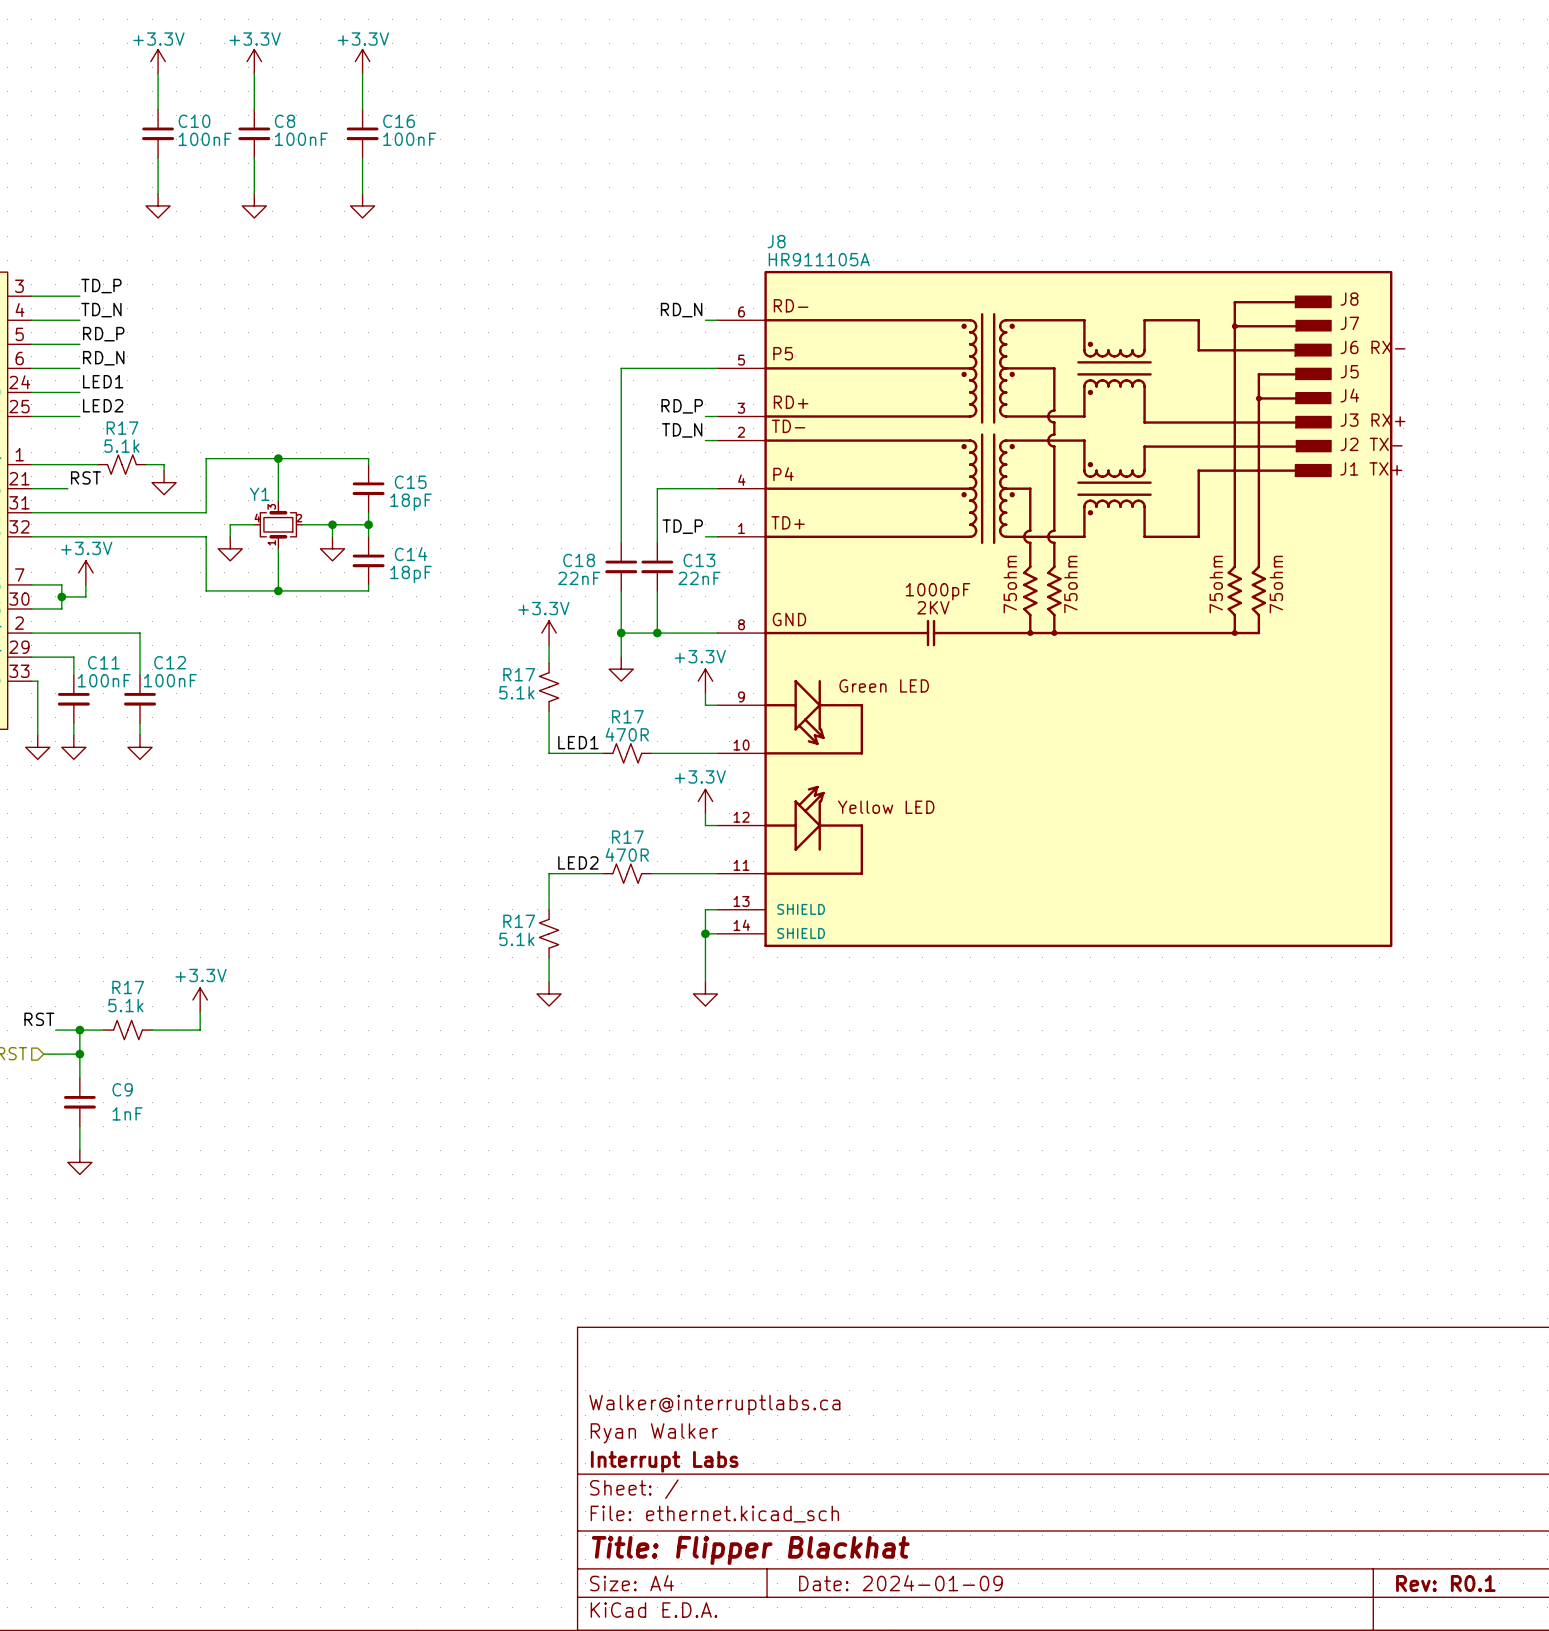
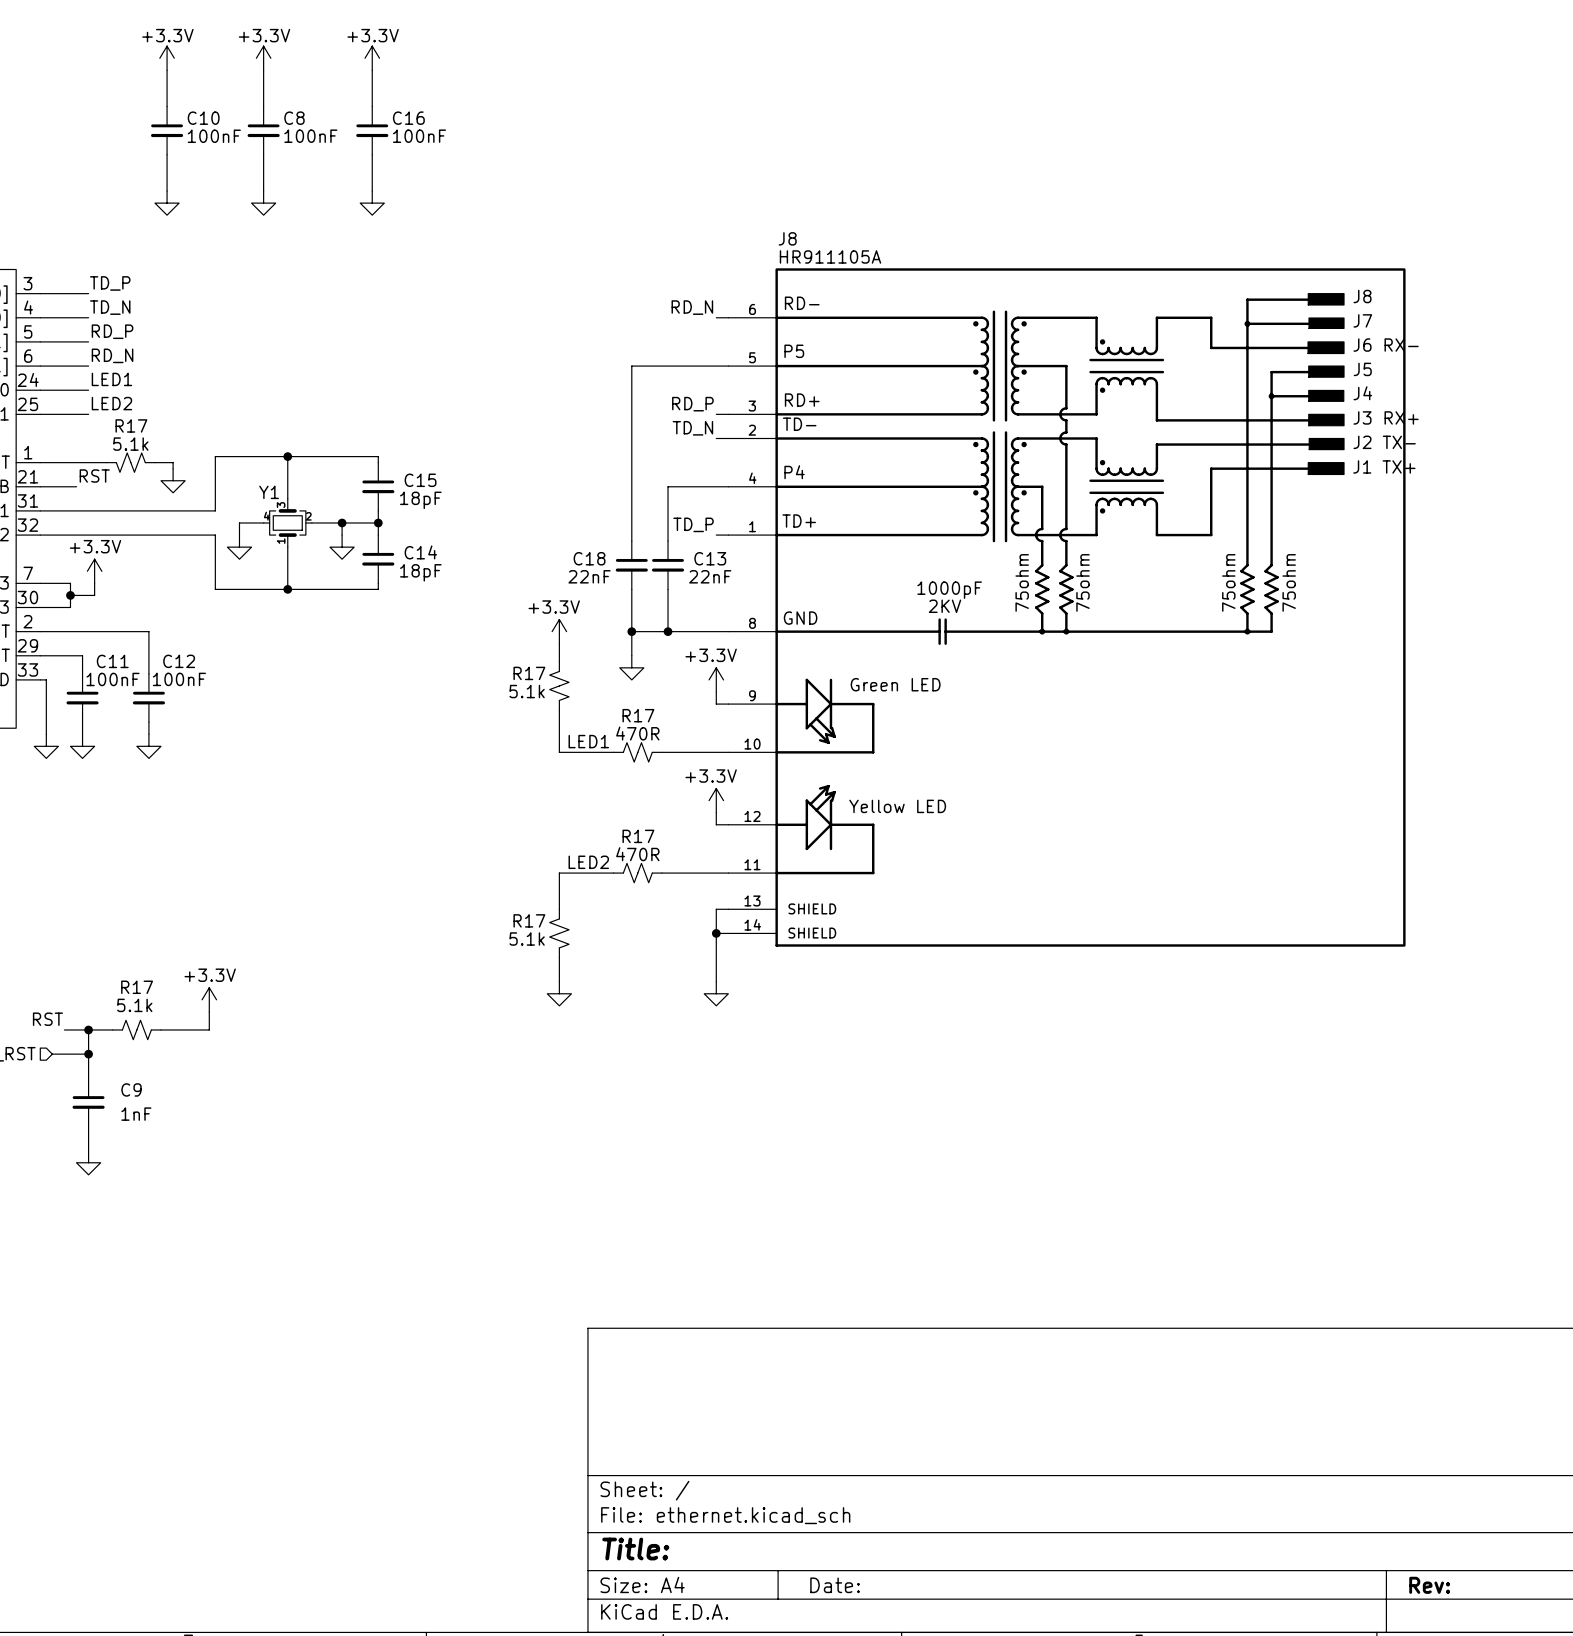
title block: Walker@interruptlabs.ca (714, 1404) -> none
title block: Ryan Walker (654, 1433) -> none
title block: Interrupt Labs (664, 1461) -> none
title block: Title: Flipper Blackhat (750, 1550) -> Title: (635, 1549)
title block: Date: 2024-01-09 (900, 1583) -> Date: (835, 1585)
title block: Rev: R0.1 (1445, 1583) -> Rev: (1429, 1585)

